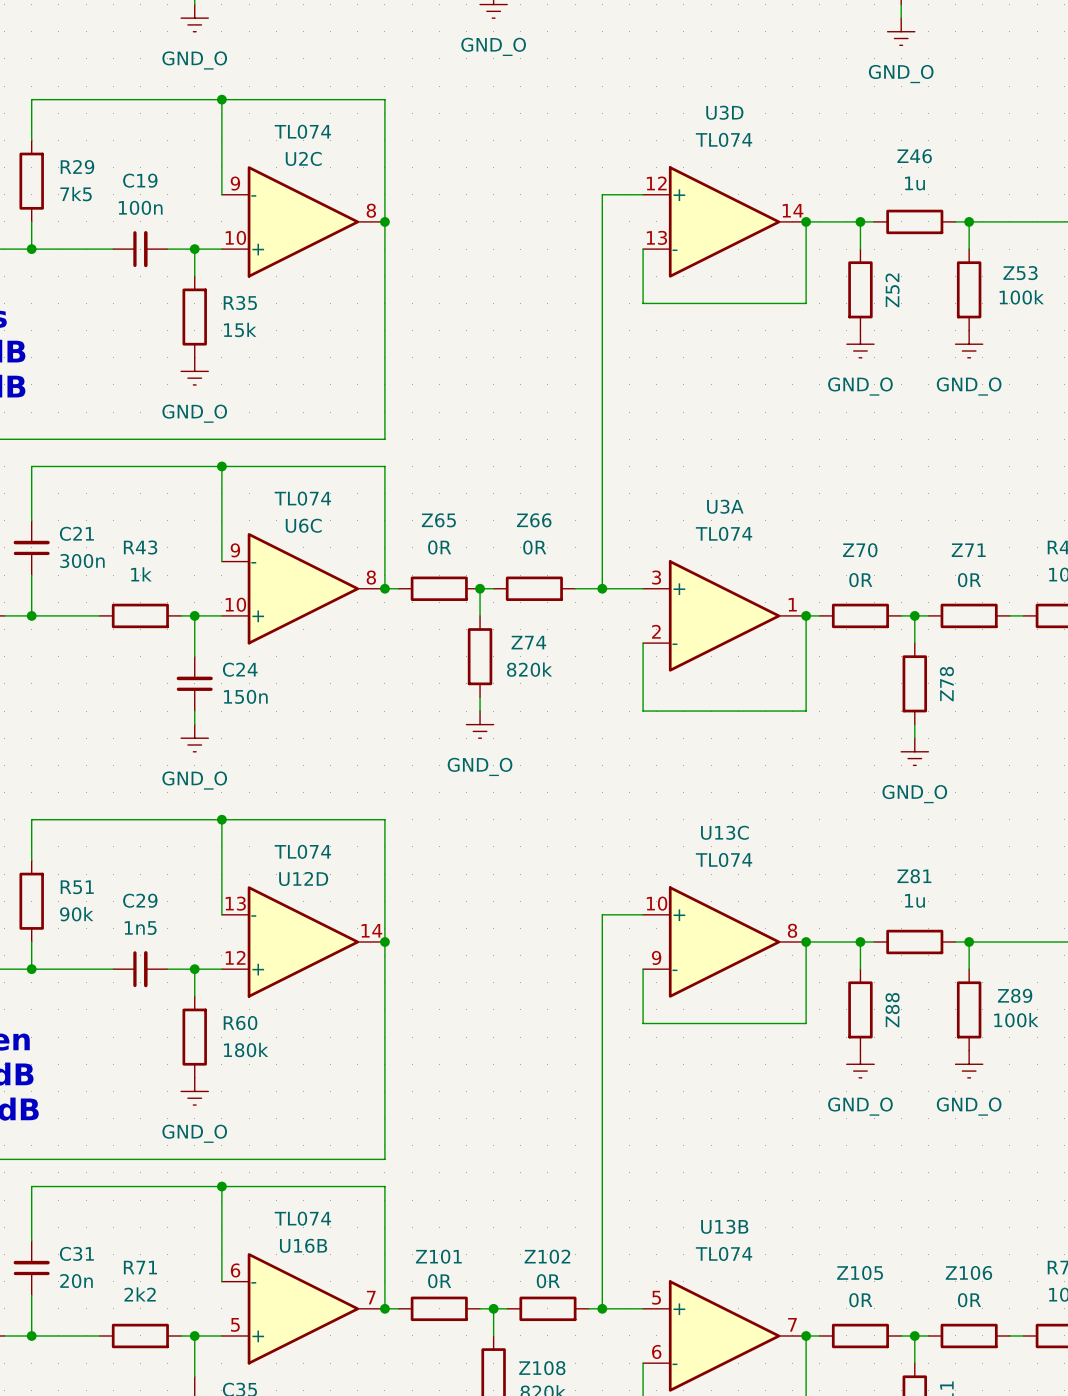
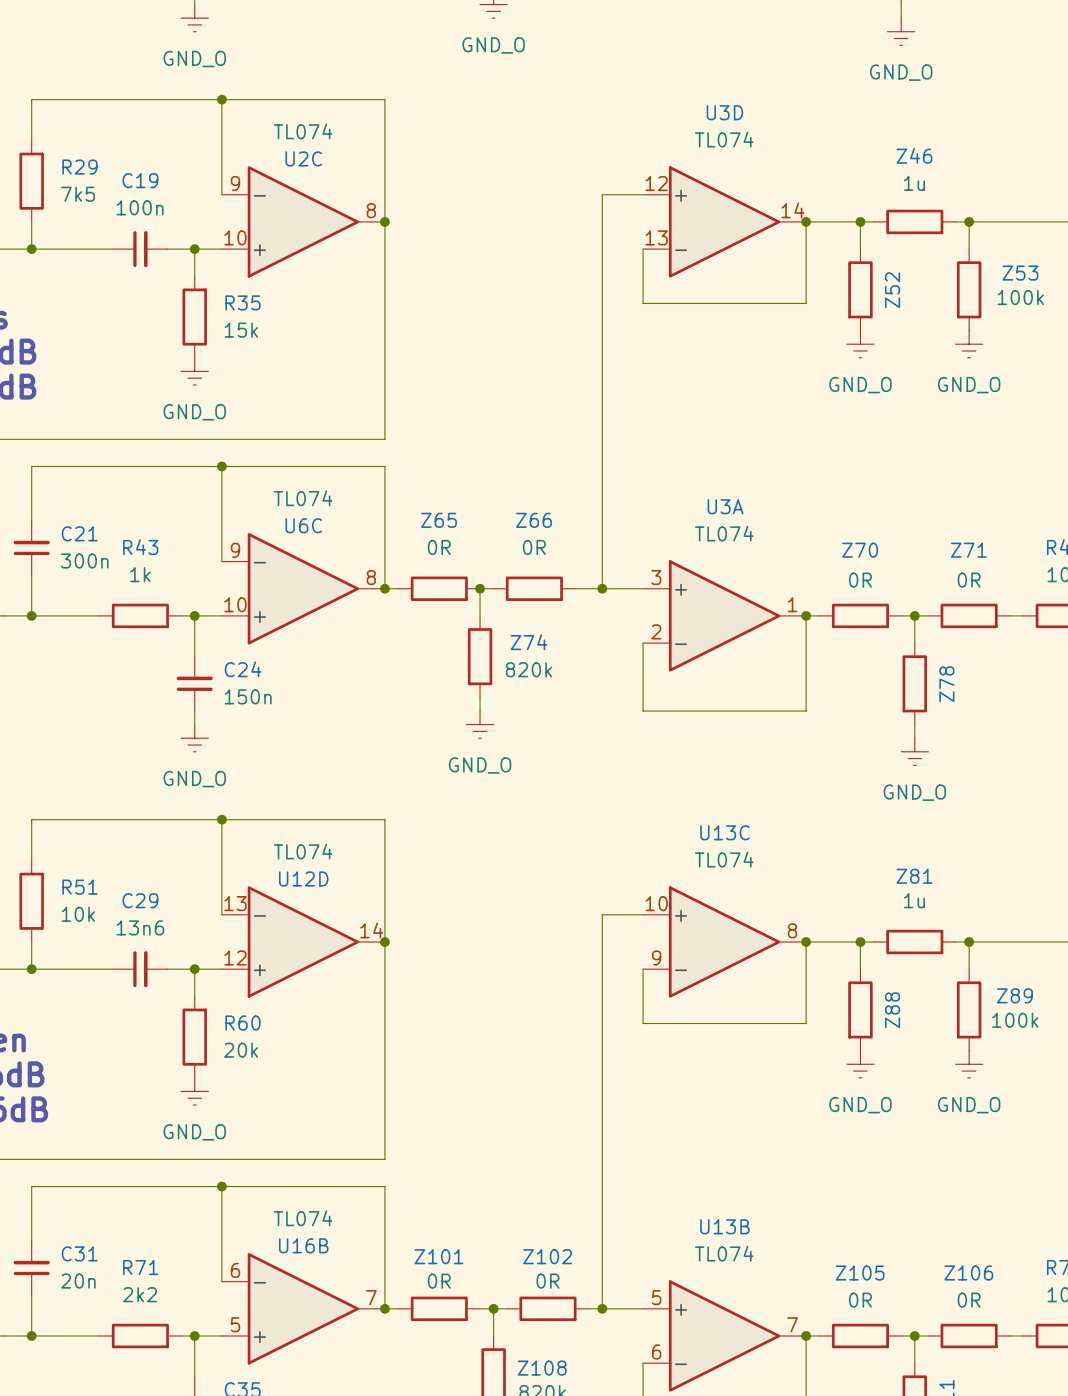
R51 value: 90k (76, 914) -> 10k (78, 914)
C29 value: 1n5 (140, 928) -> 13n6 (140, 927)
R60 value: 180k (246, 1050) -> 20k (241, 1050)

